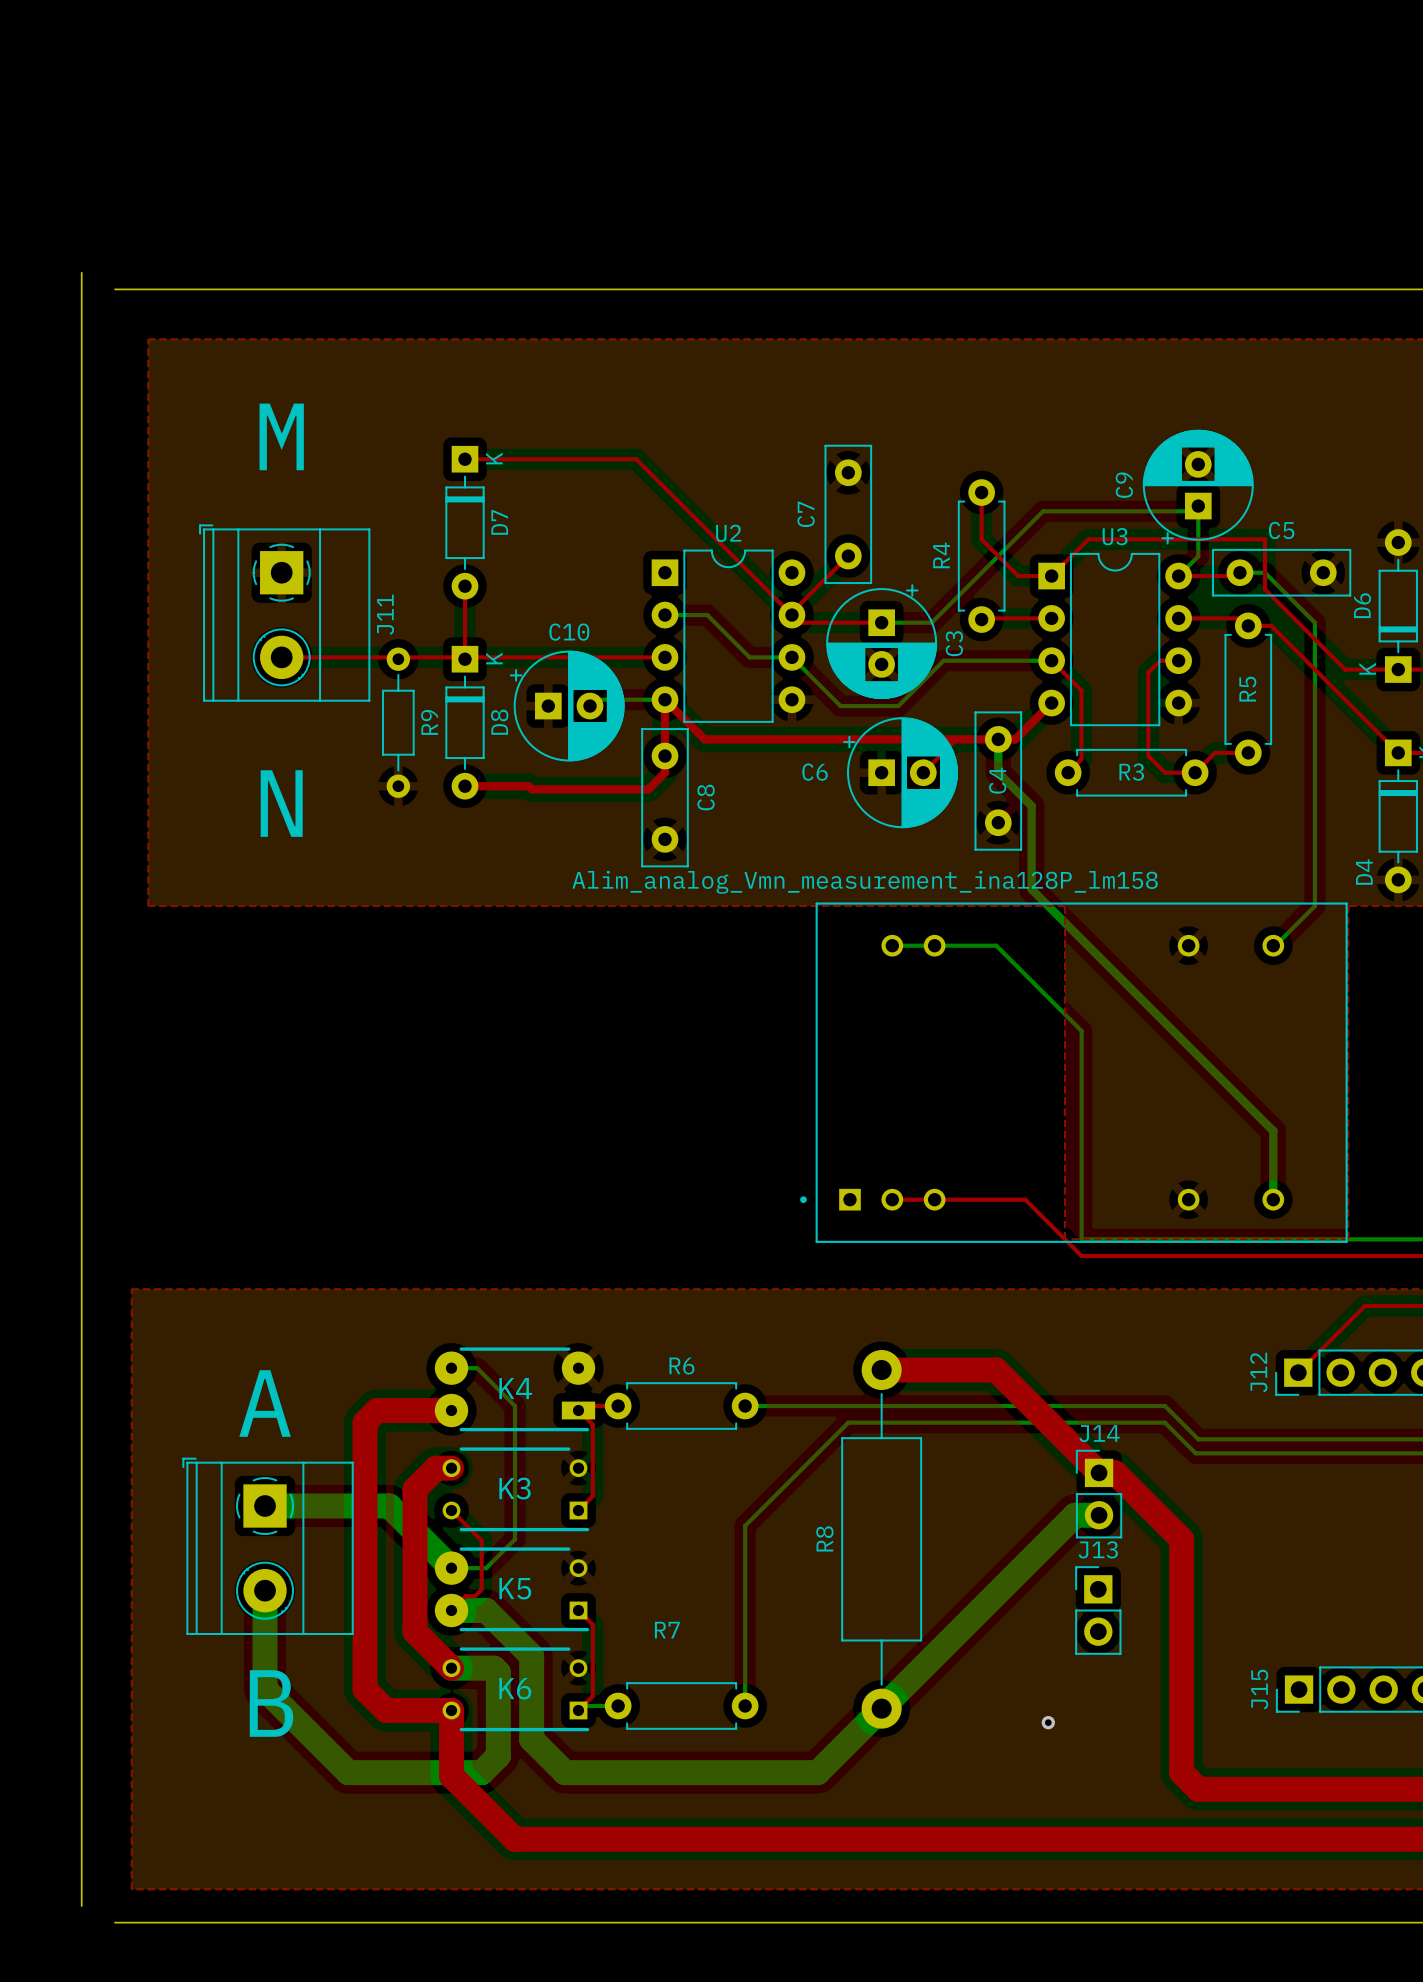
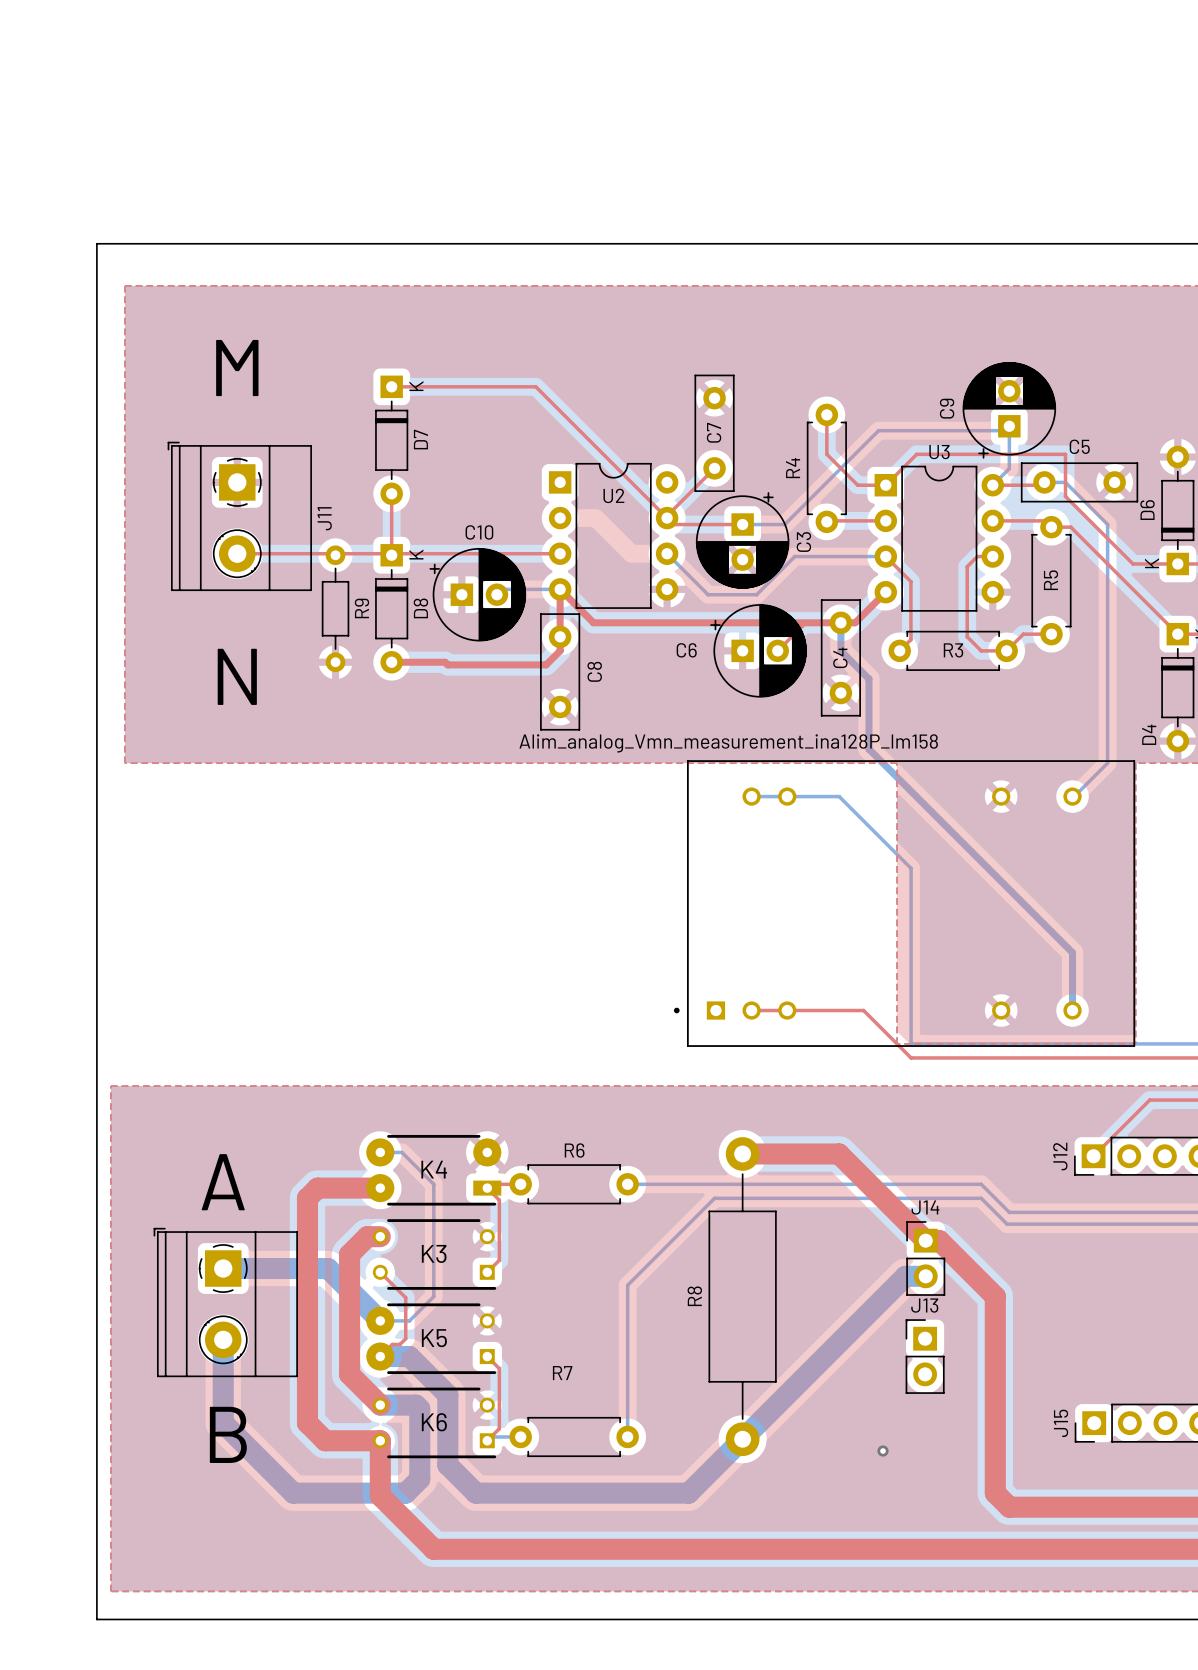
board edge: (81, 272) (81, 1905) -> (96, 243) (96, 1619)
C7 name position: C7 (806, 514) -> C7 (714, 432)
U2 name position: U2 (728, 533) -> U2 (613, 495)
bottom track: (665, 615) (707, 615) (749, 657) (791, 657) -> none

